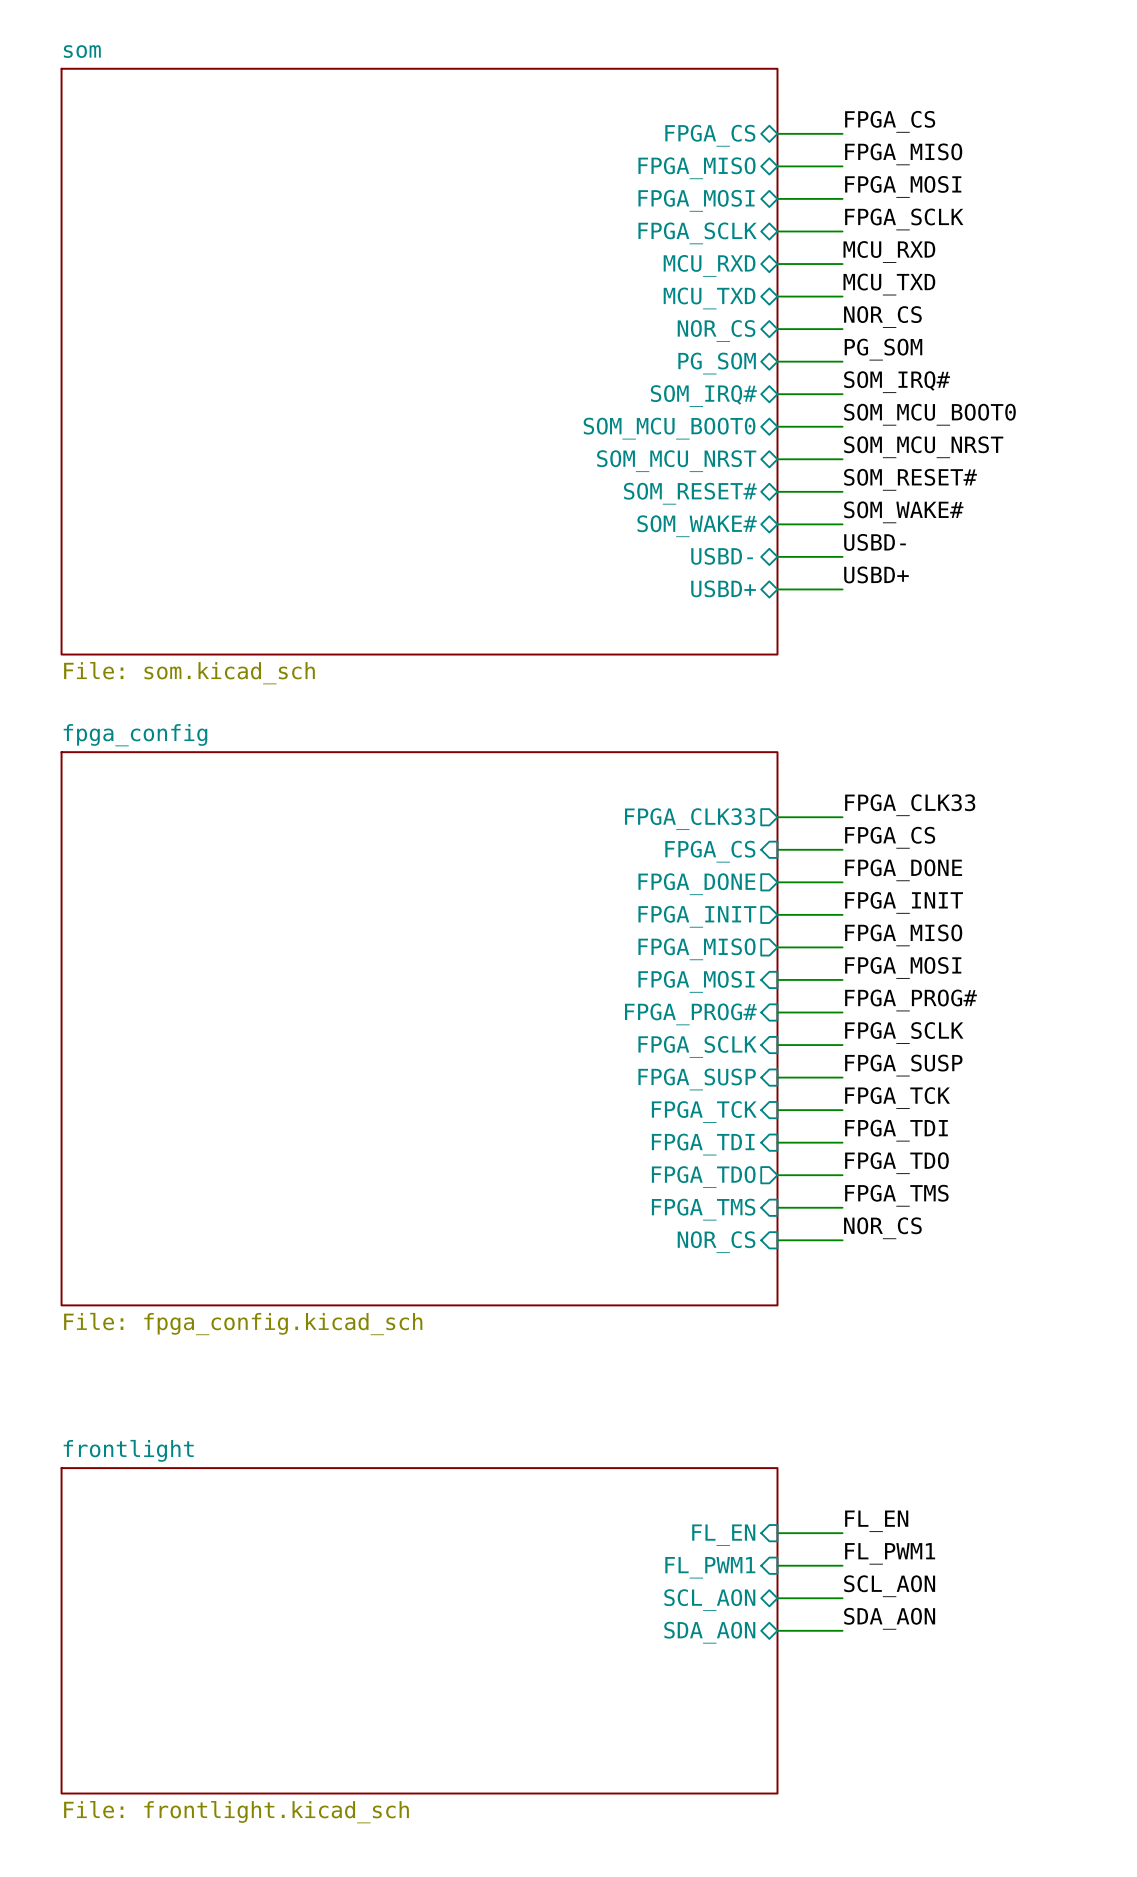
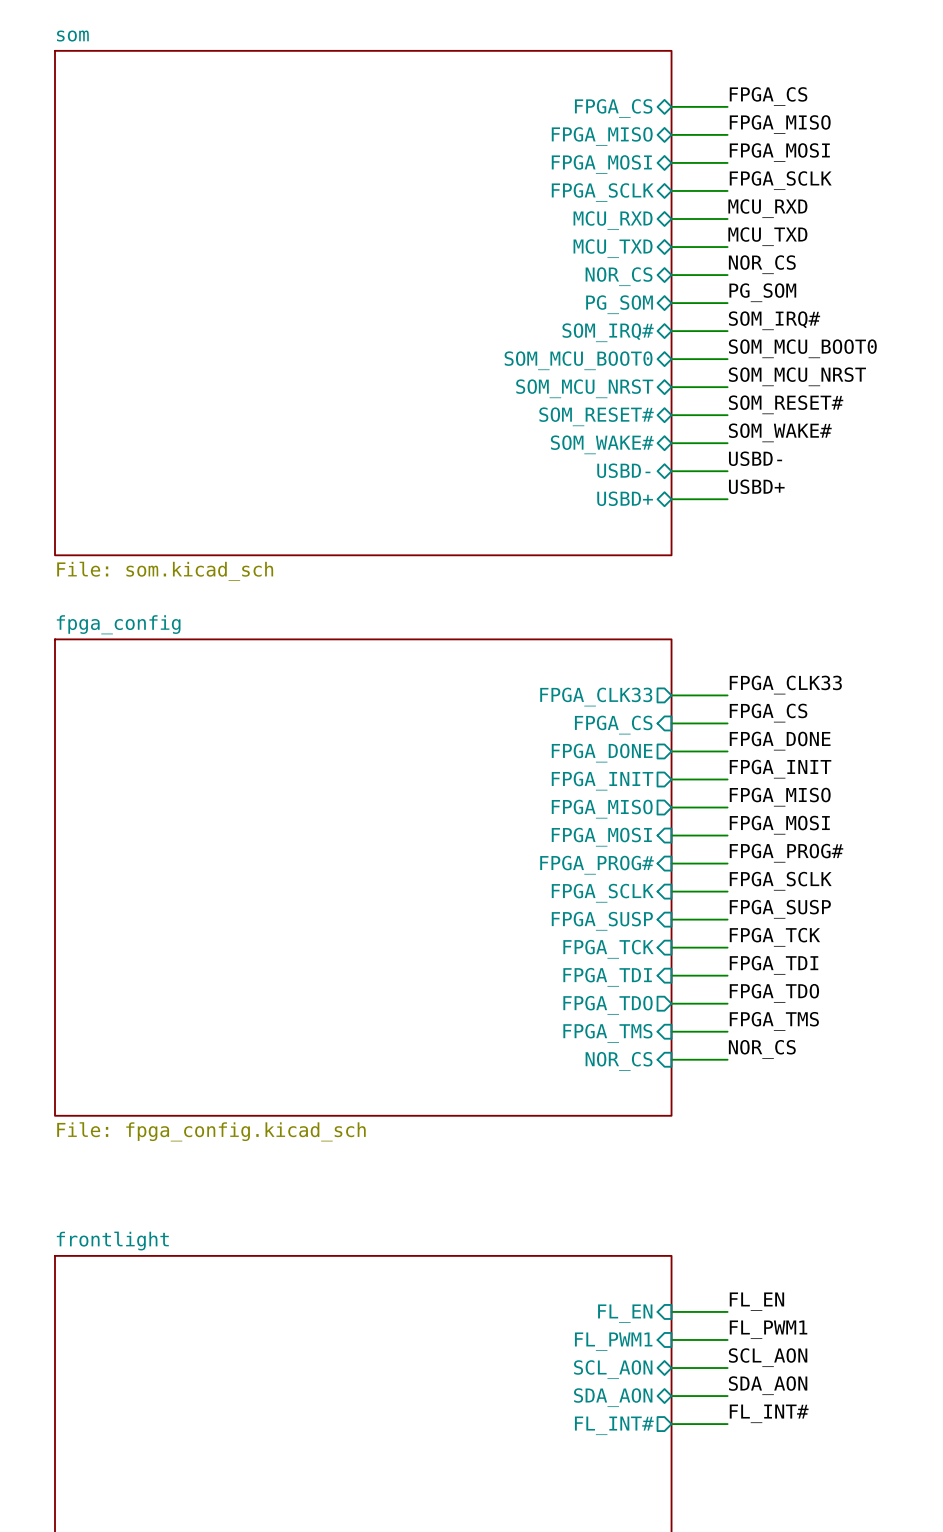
label: none -> FL_INT# (769, 1413)
wire: none -> (671, 1424) (727, 1424)
sheet pin: none -> FL_INT# (614, 1425)

